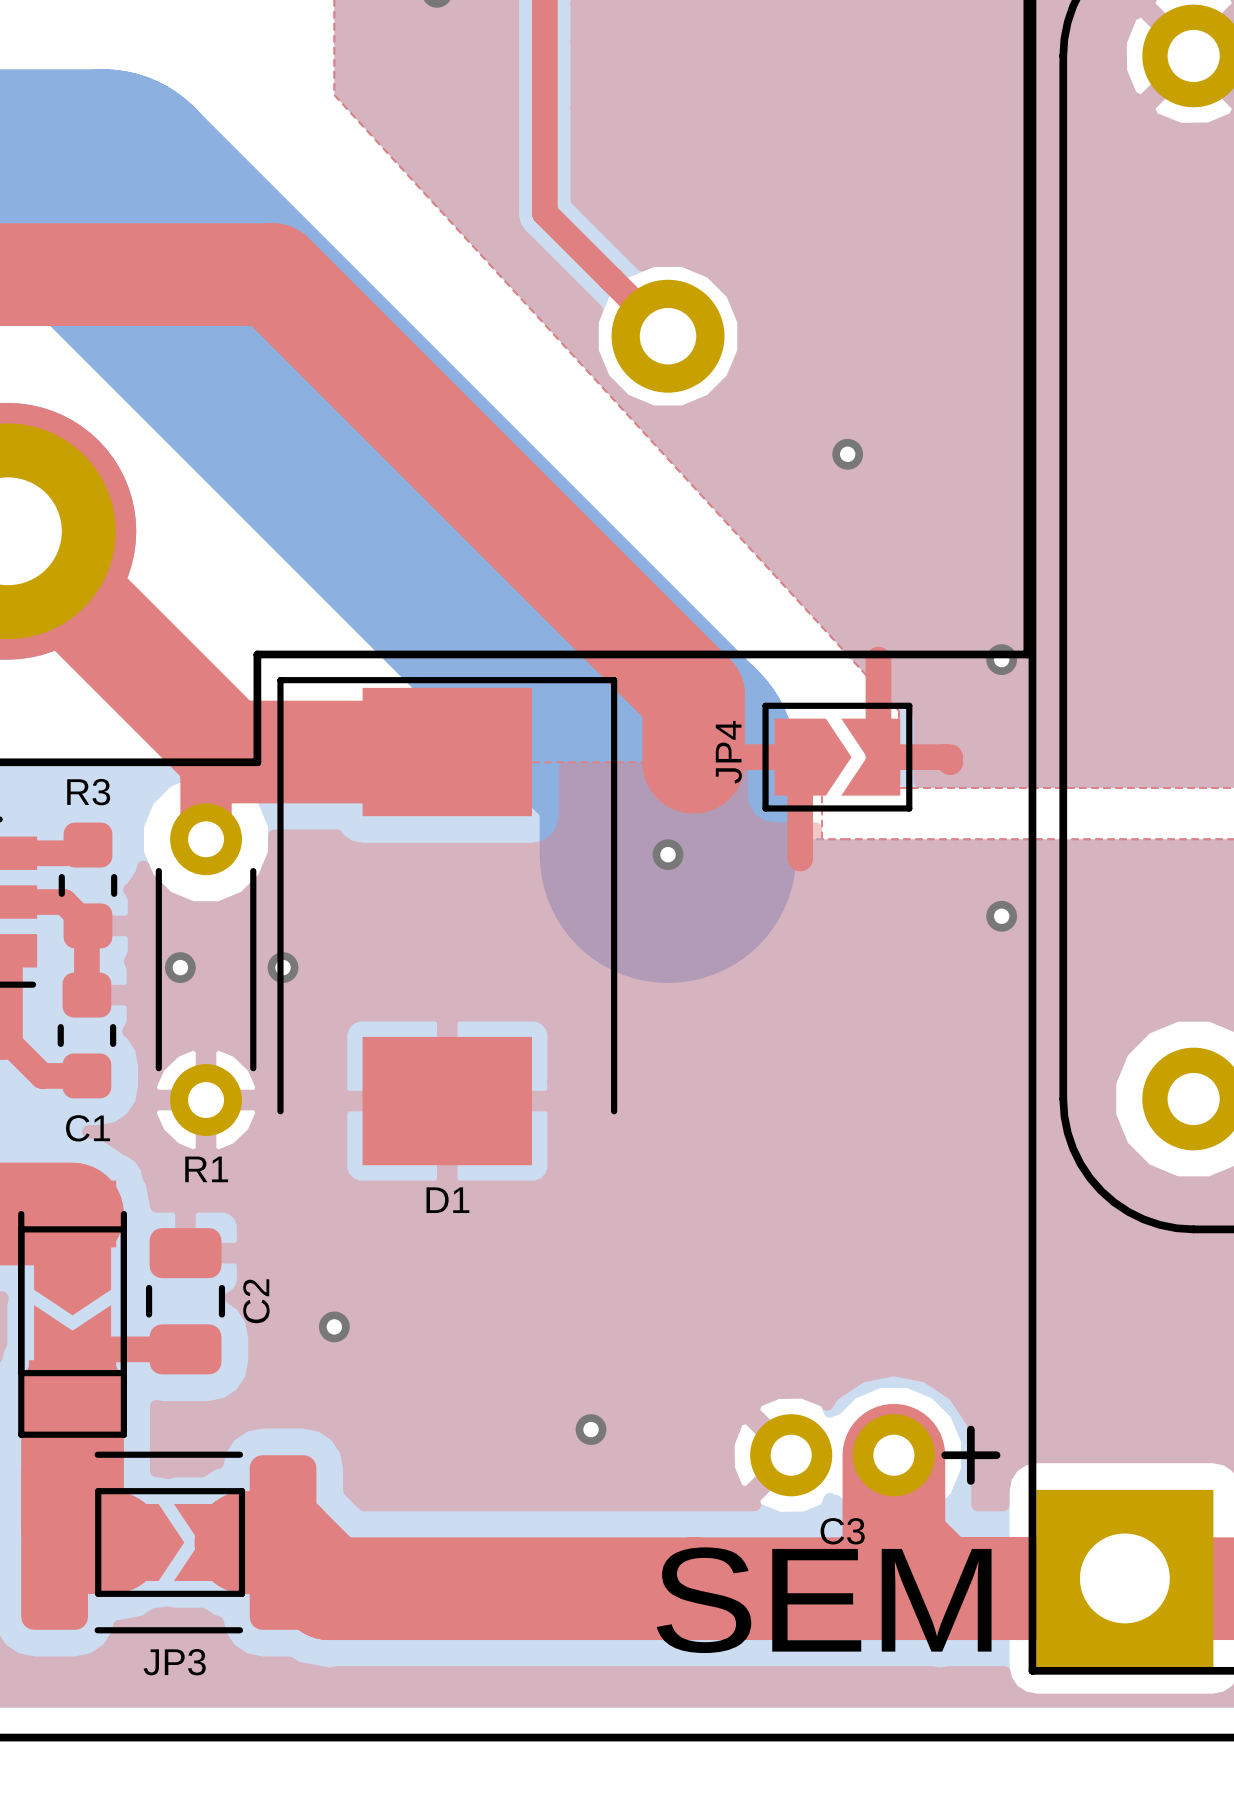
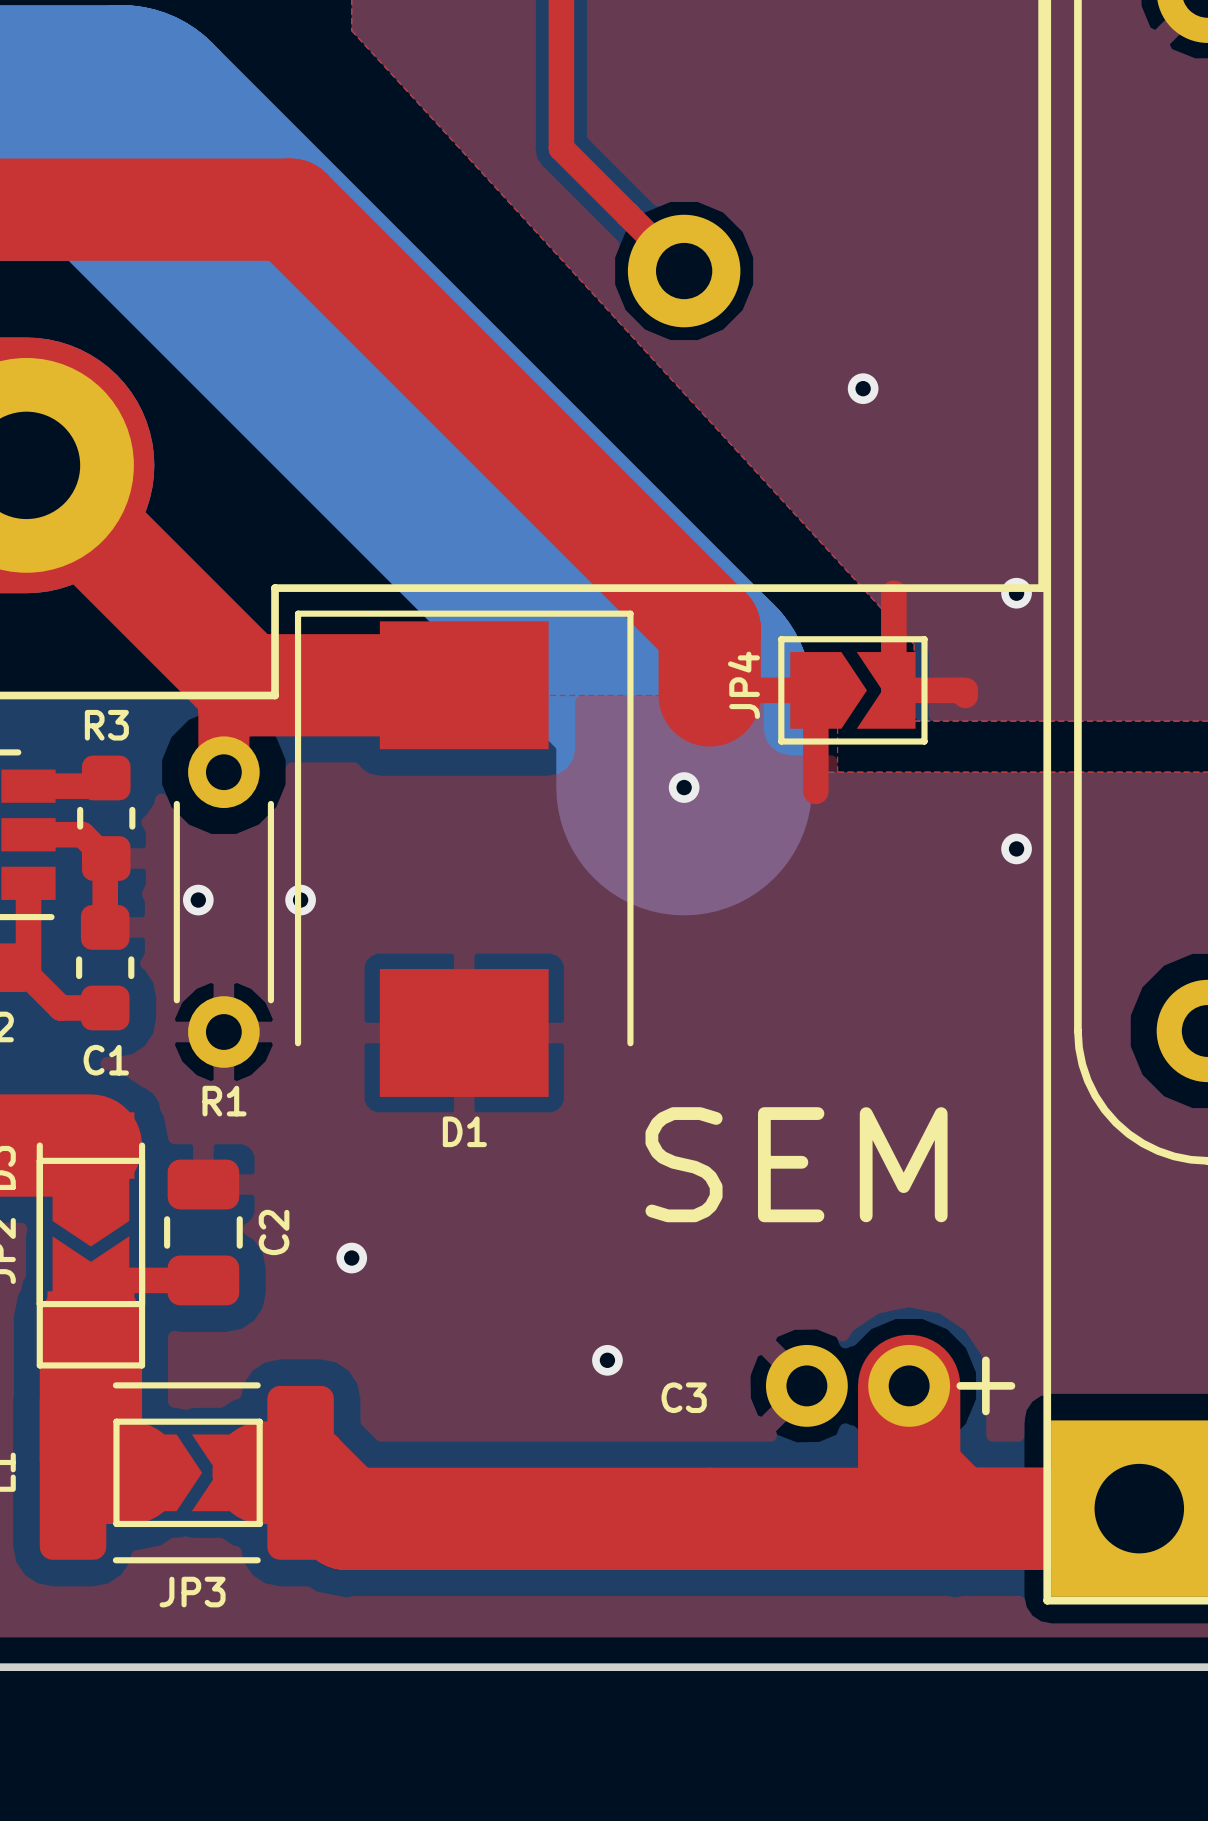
C3 name position: C3 (842, 1531) -> C3 (684, 1397)
text position: SEM (824, 1600) -> SEM (796, 1164)

